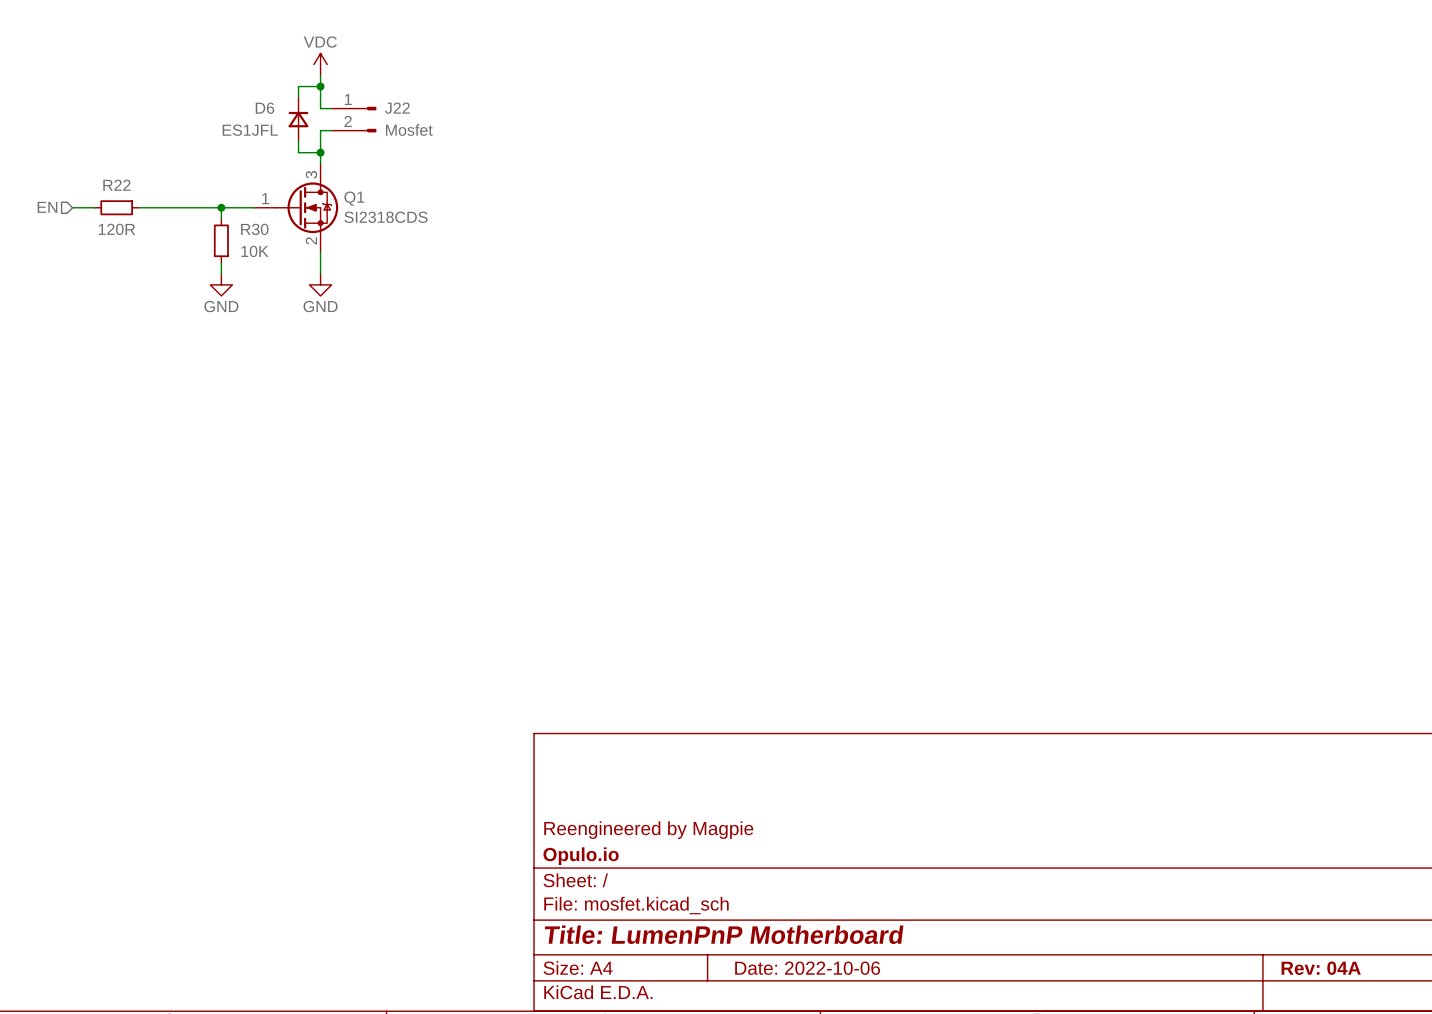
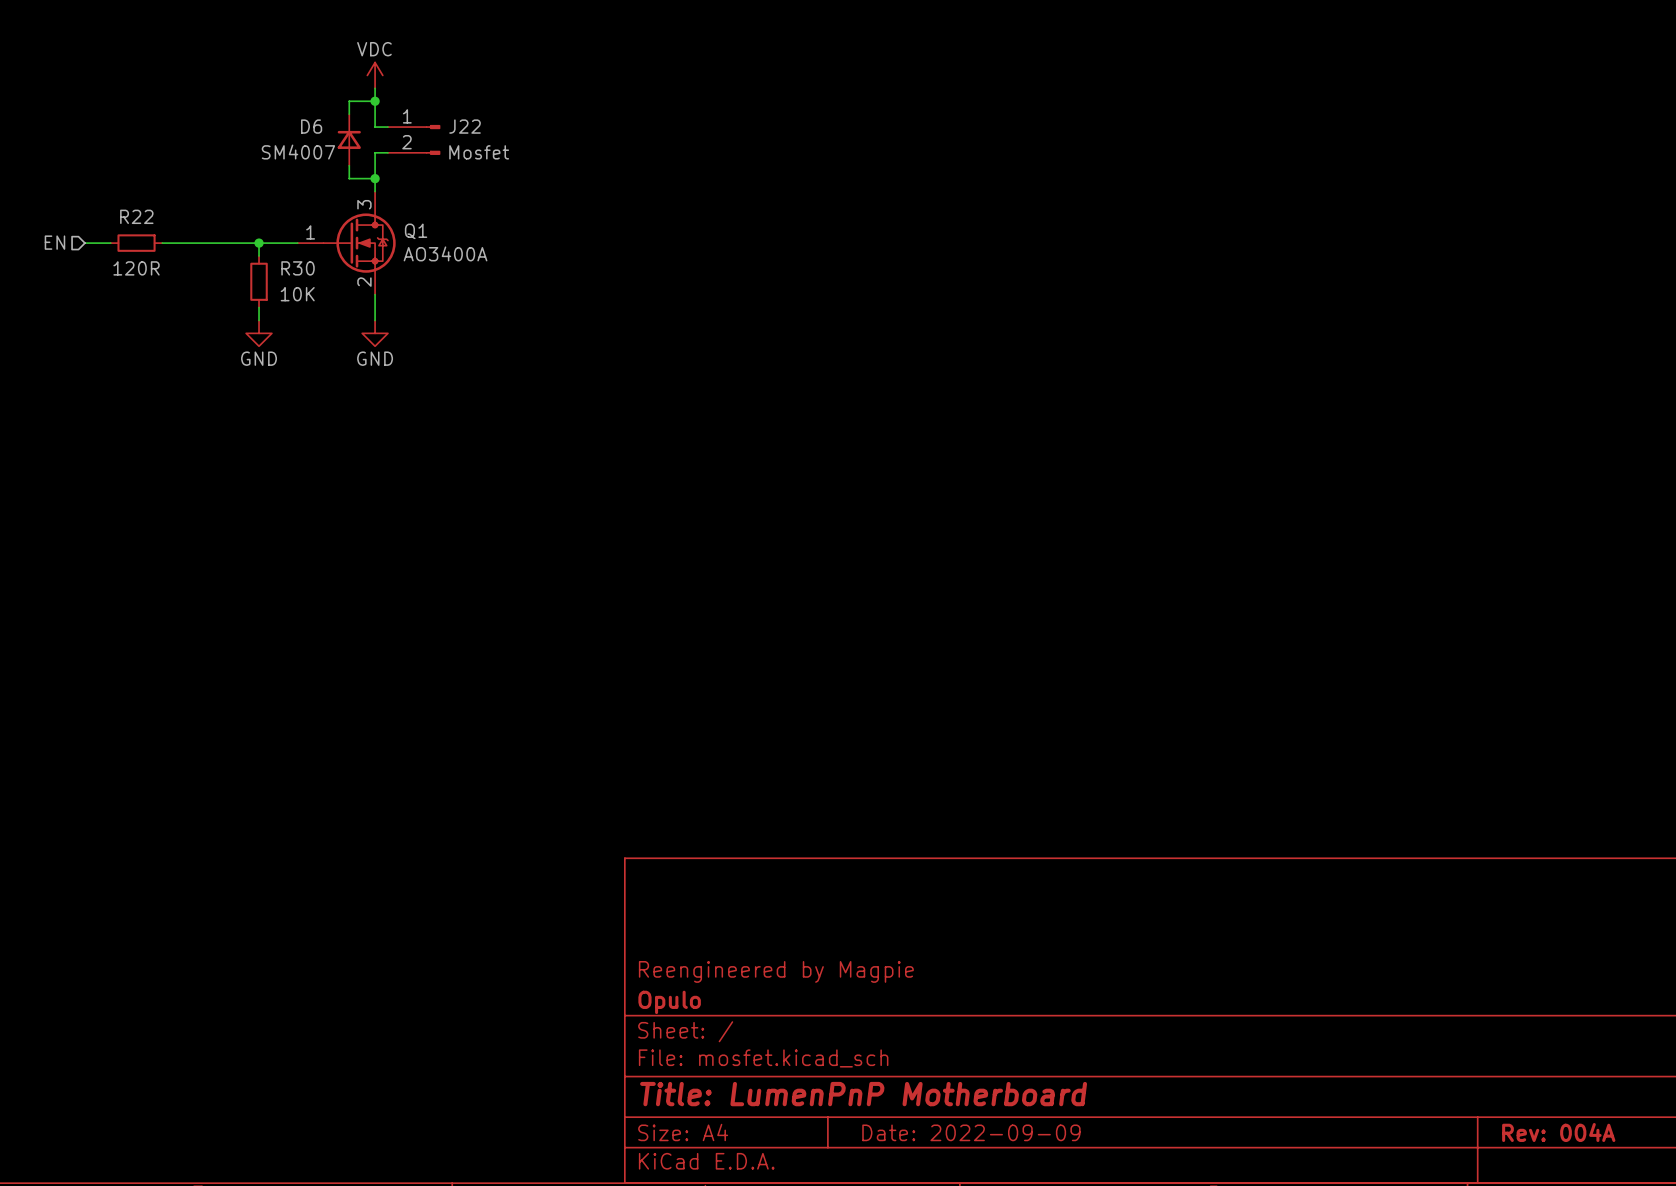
D6 value: ES1JFL (250, 130) -> SM4007 (298, 152)
Q1 value: SI2318CDS (386, 217) -> AO3400A (445, 253)
title block: Opulo.io (581, 856) -> Opulo (669, 1002)
title block: Date: 2022-10-06 (807, 968) -> Date: 2022-09-09 (971, 1132)
title block: Rev: 04A (1321, 968) -> Rev: 004A (1558, 1132)

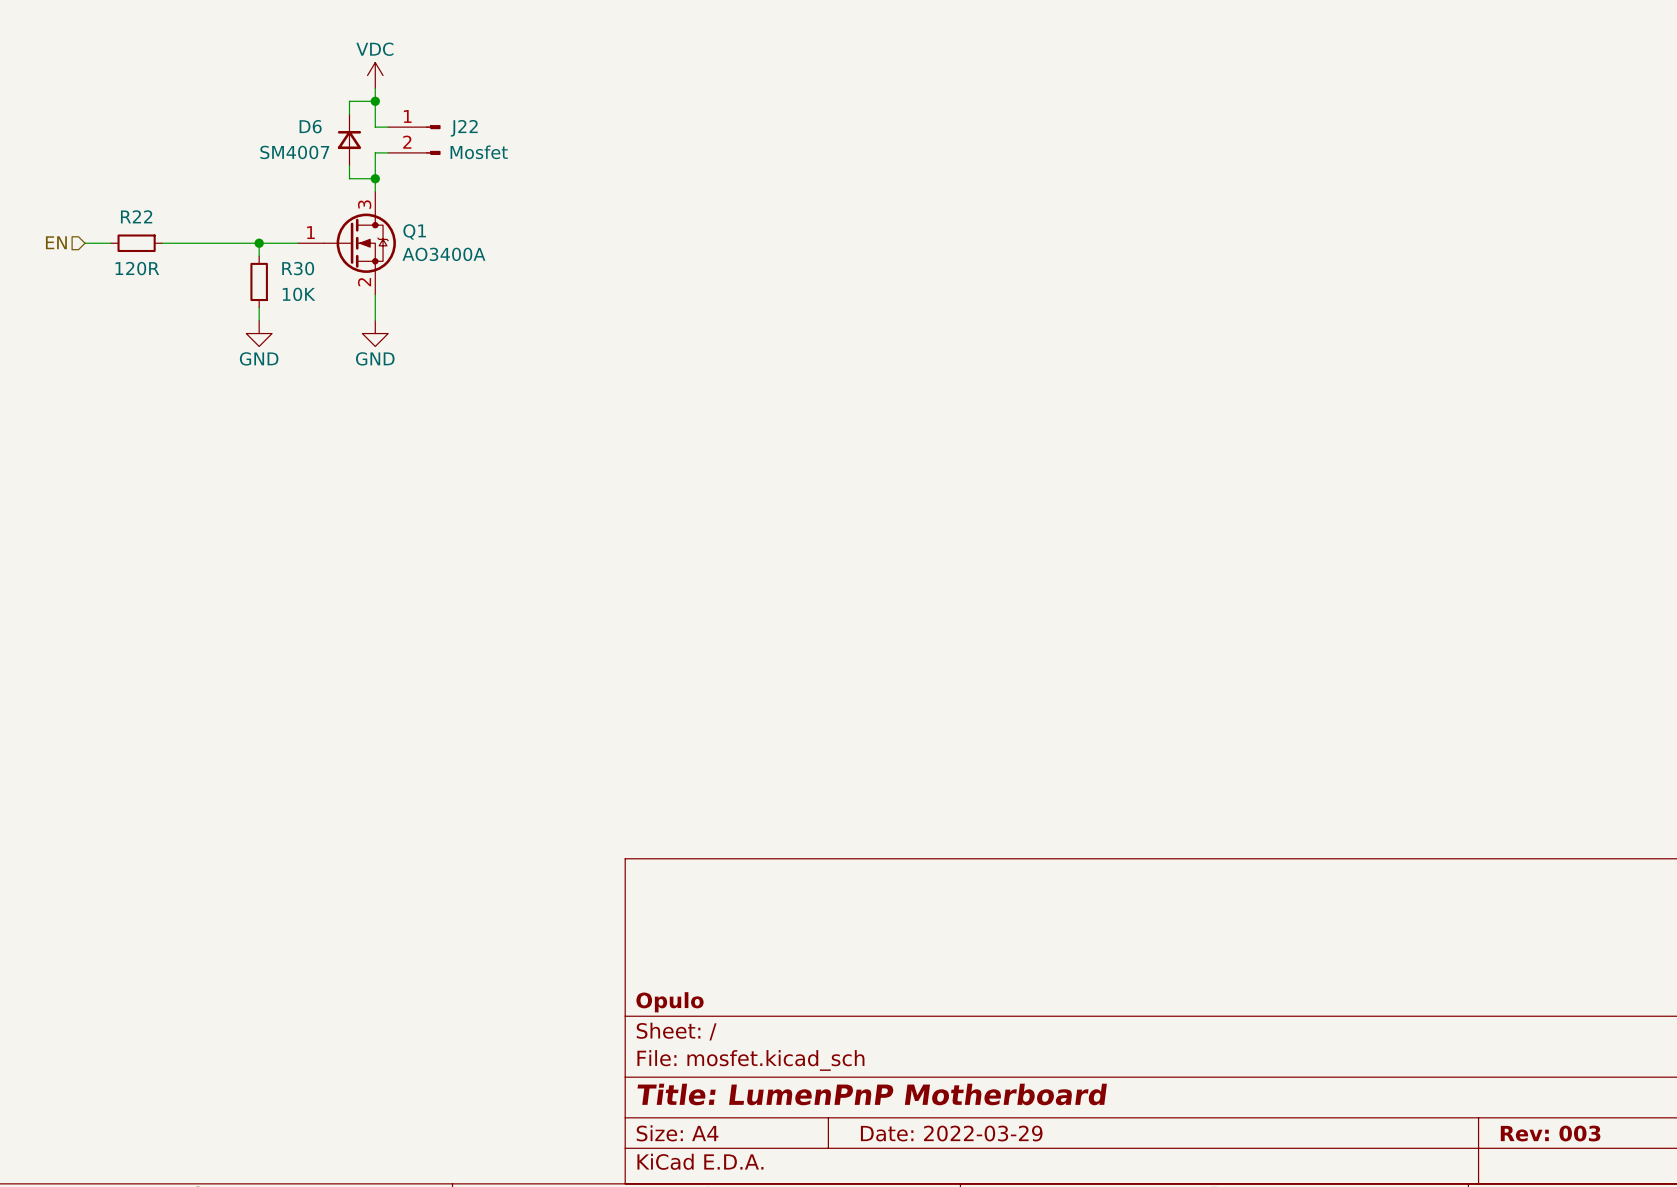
title block: Reengineered by Magpie (776, 971) -> none
title block: Date: 2022-09-09 (971, 1132) -> Date: 2022-03-29 (951, 1133)
title block: Rev: 004A (1558, 1132) -> Rev: 003 (1550, 1133)

